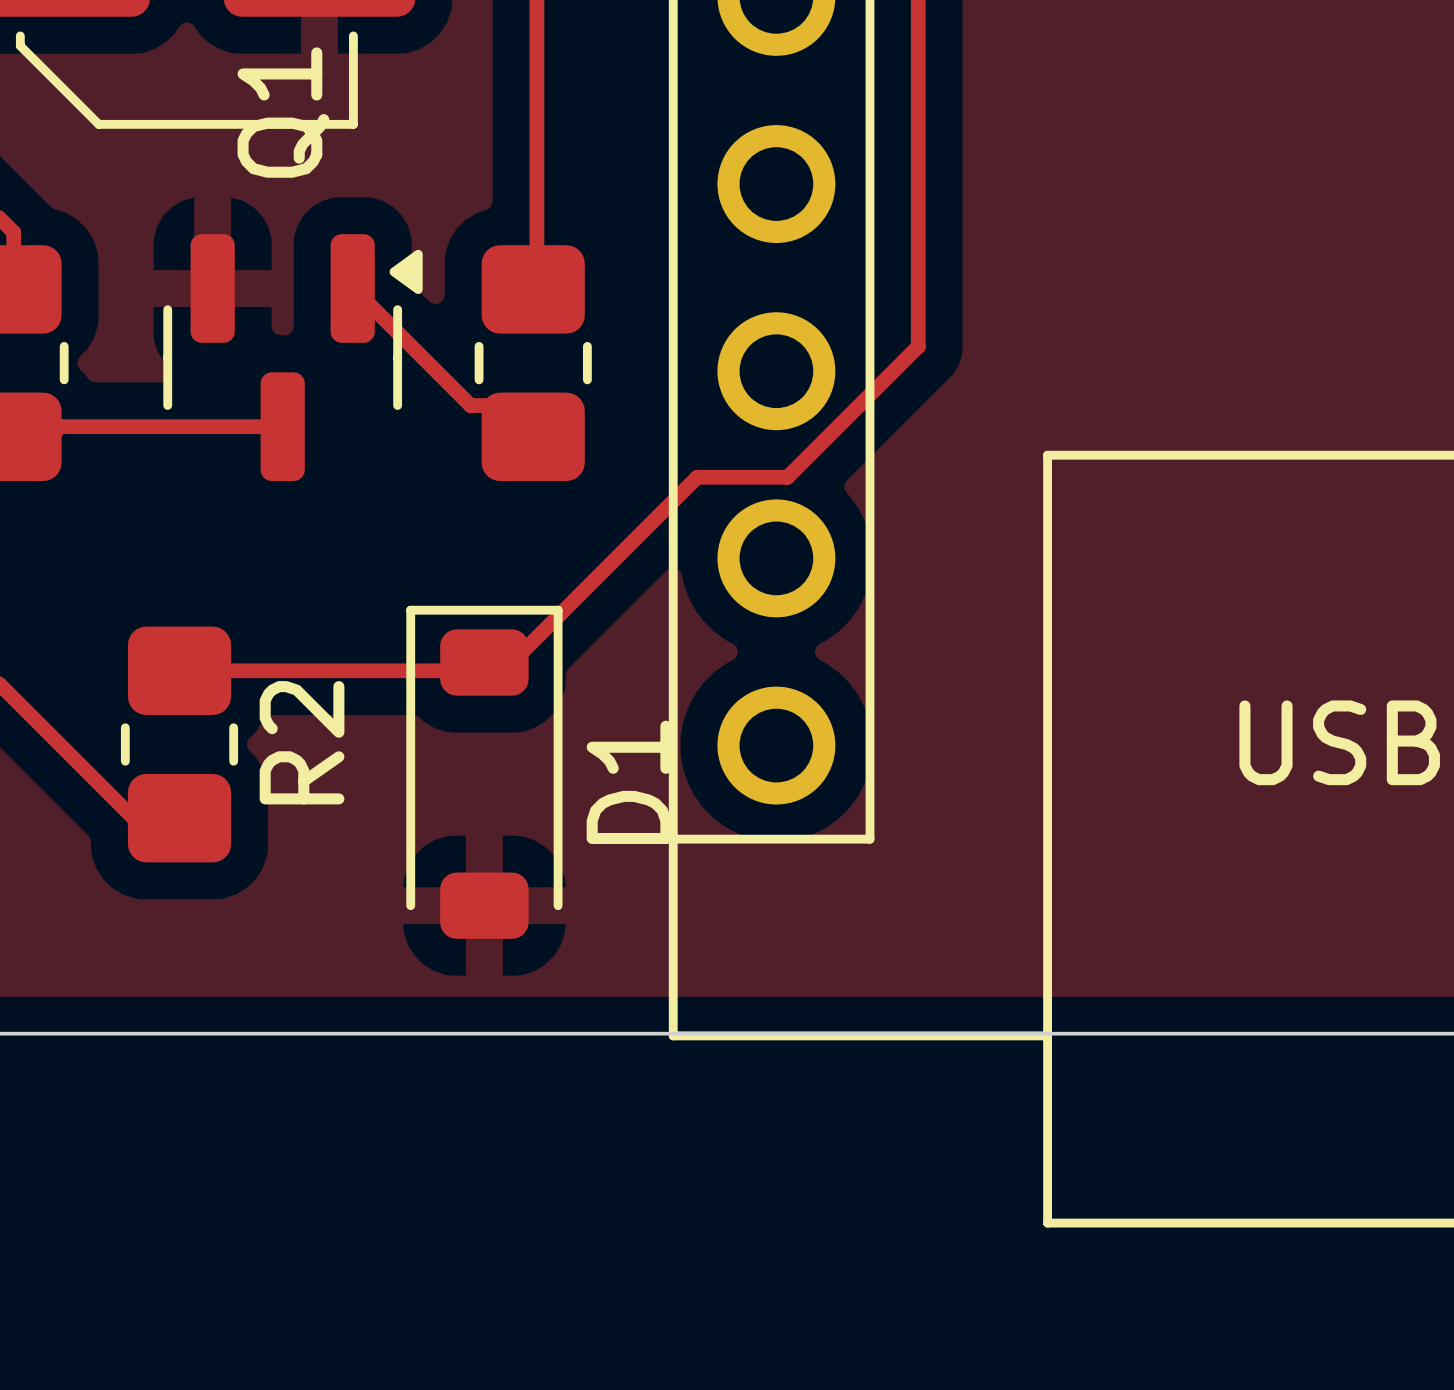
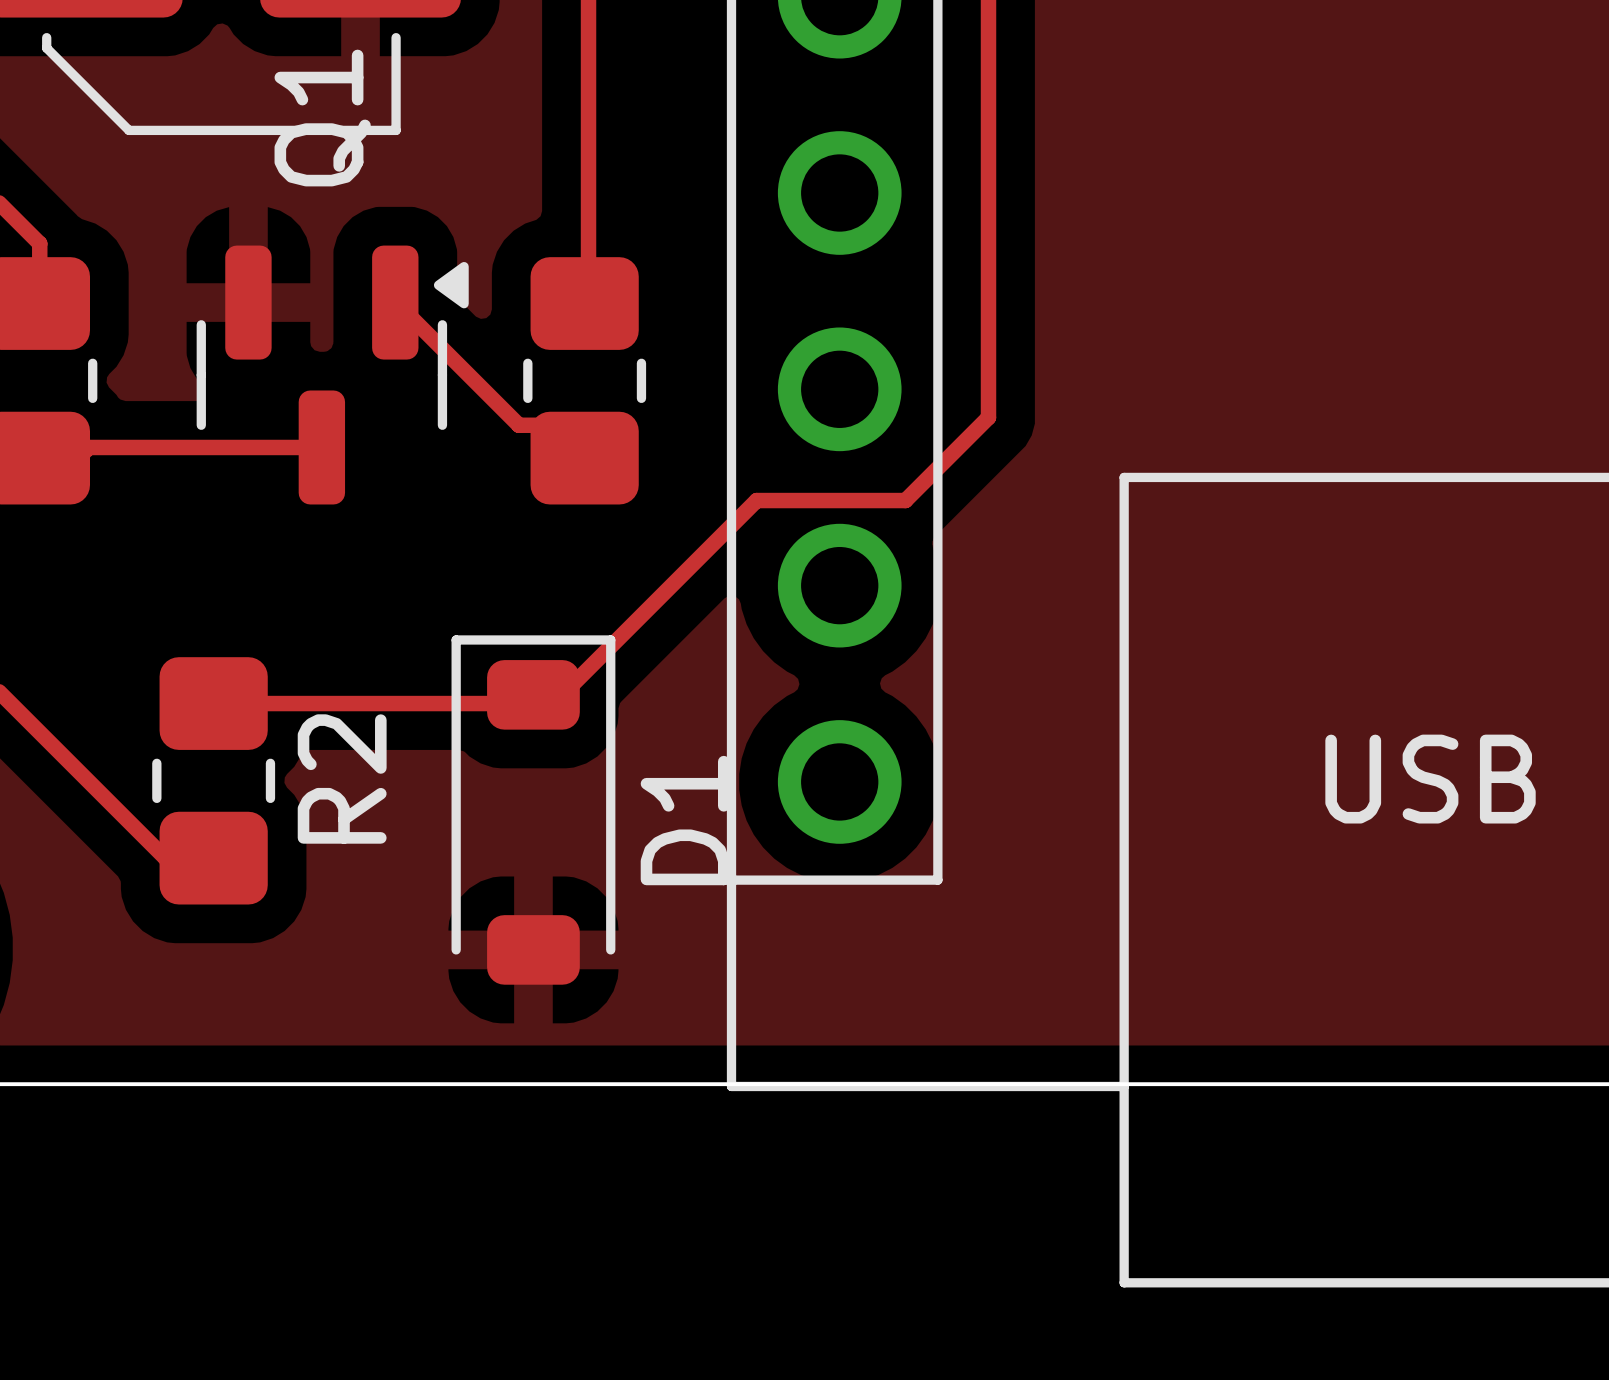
track: (918, 346) (787, 477) -> (988, 363) (988, 417) (905, 500) (851, 500)

